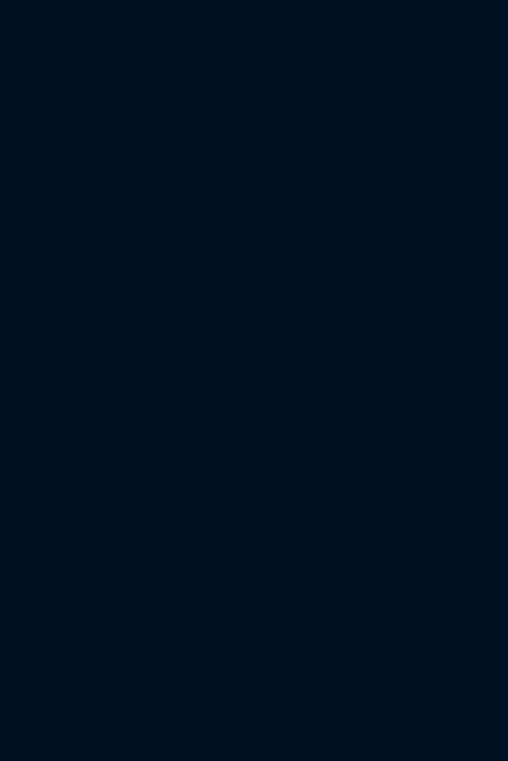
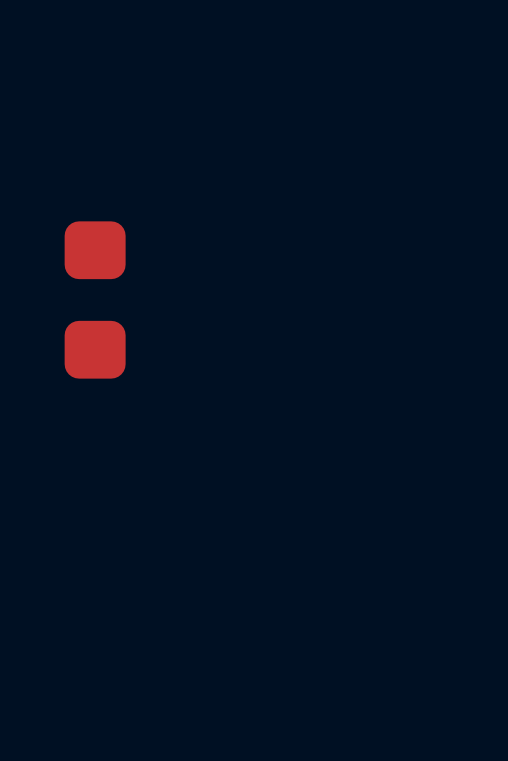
part: none -> (95, 299)

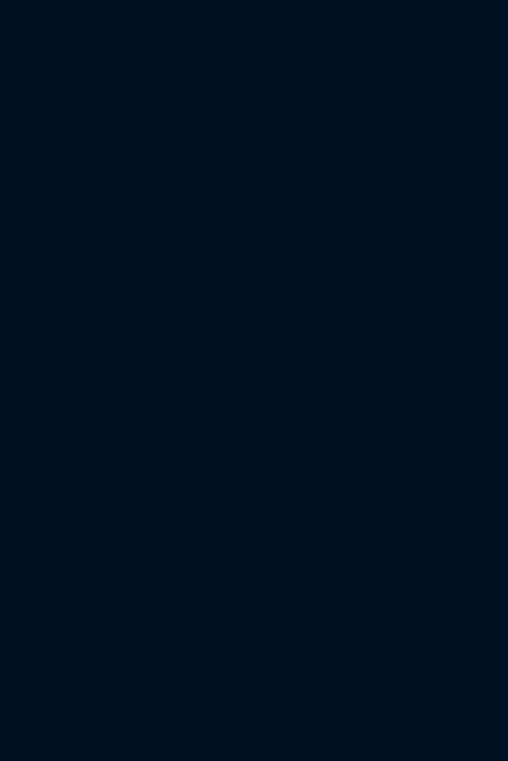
part: (95, 299) -> none

